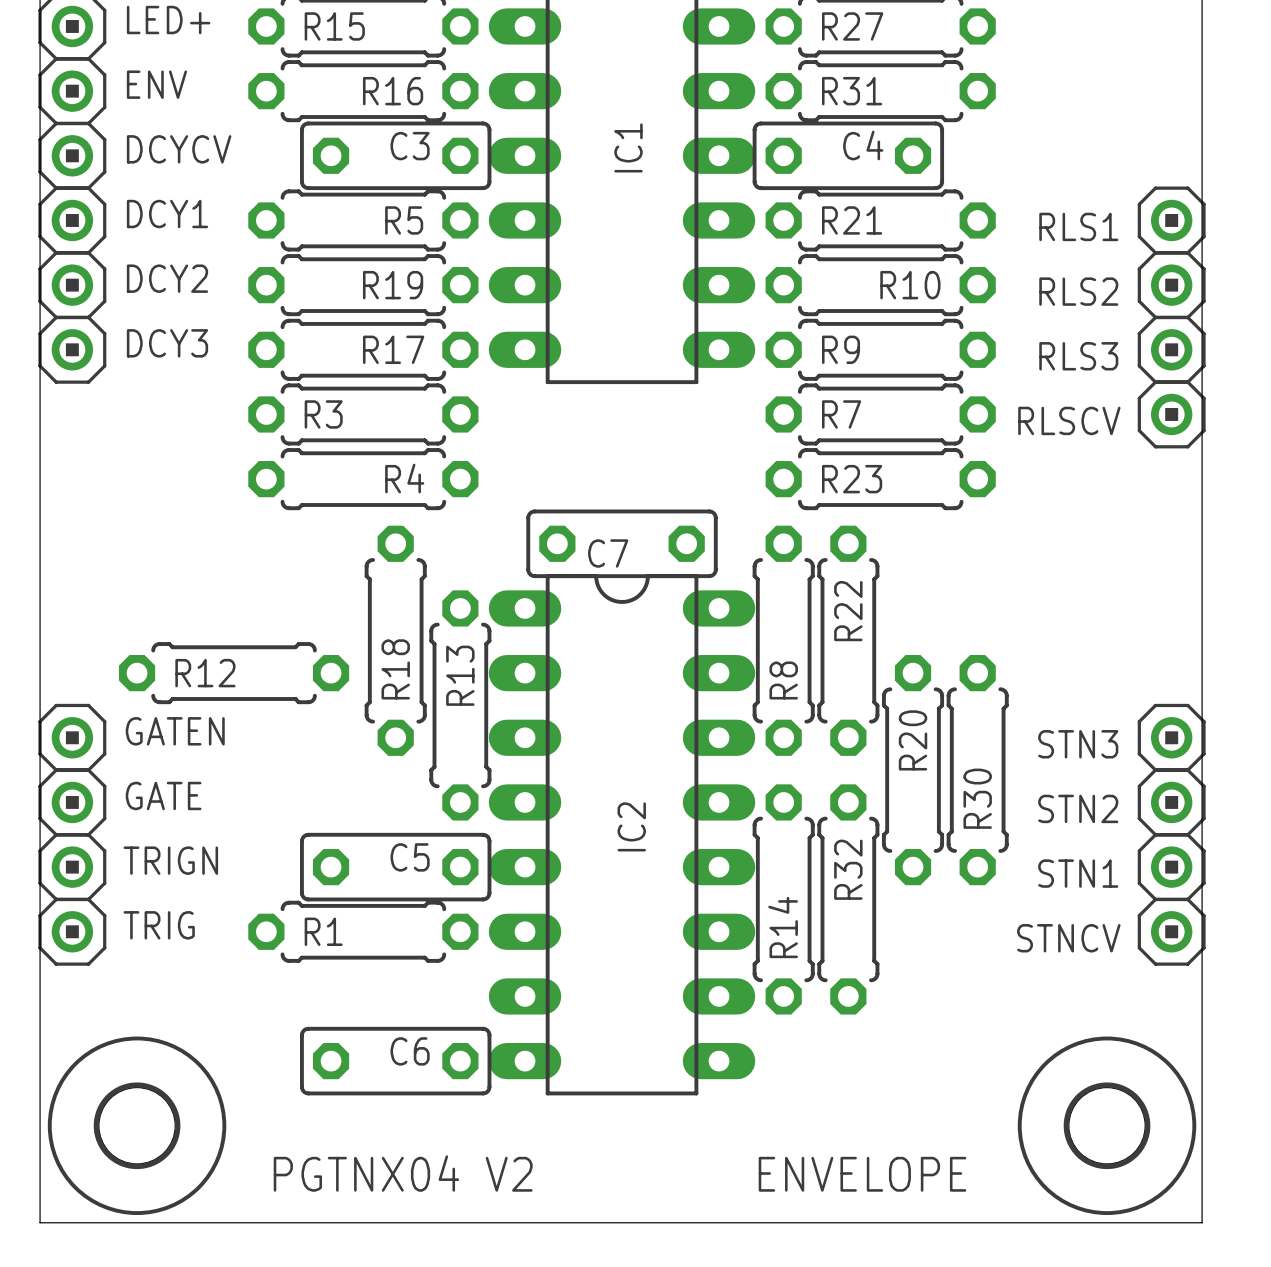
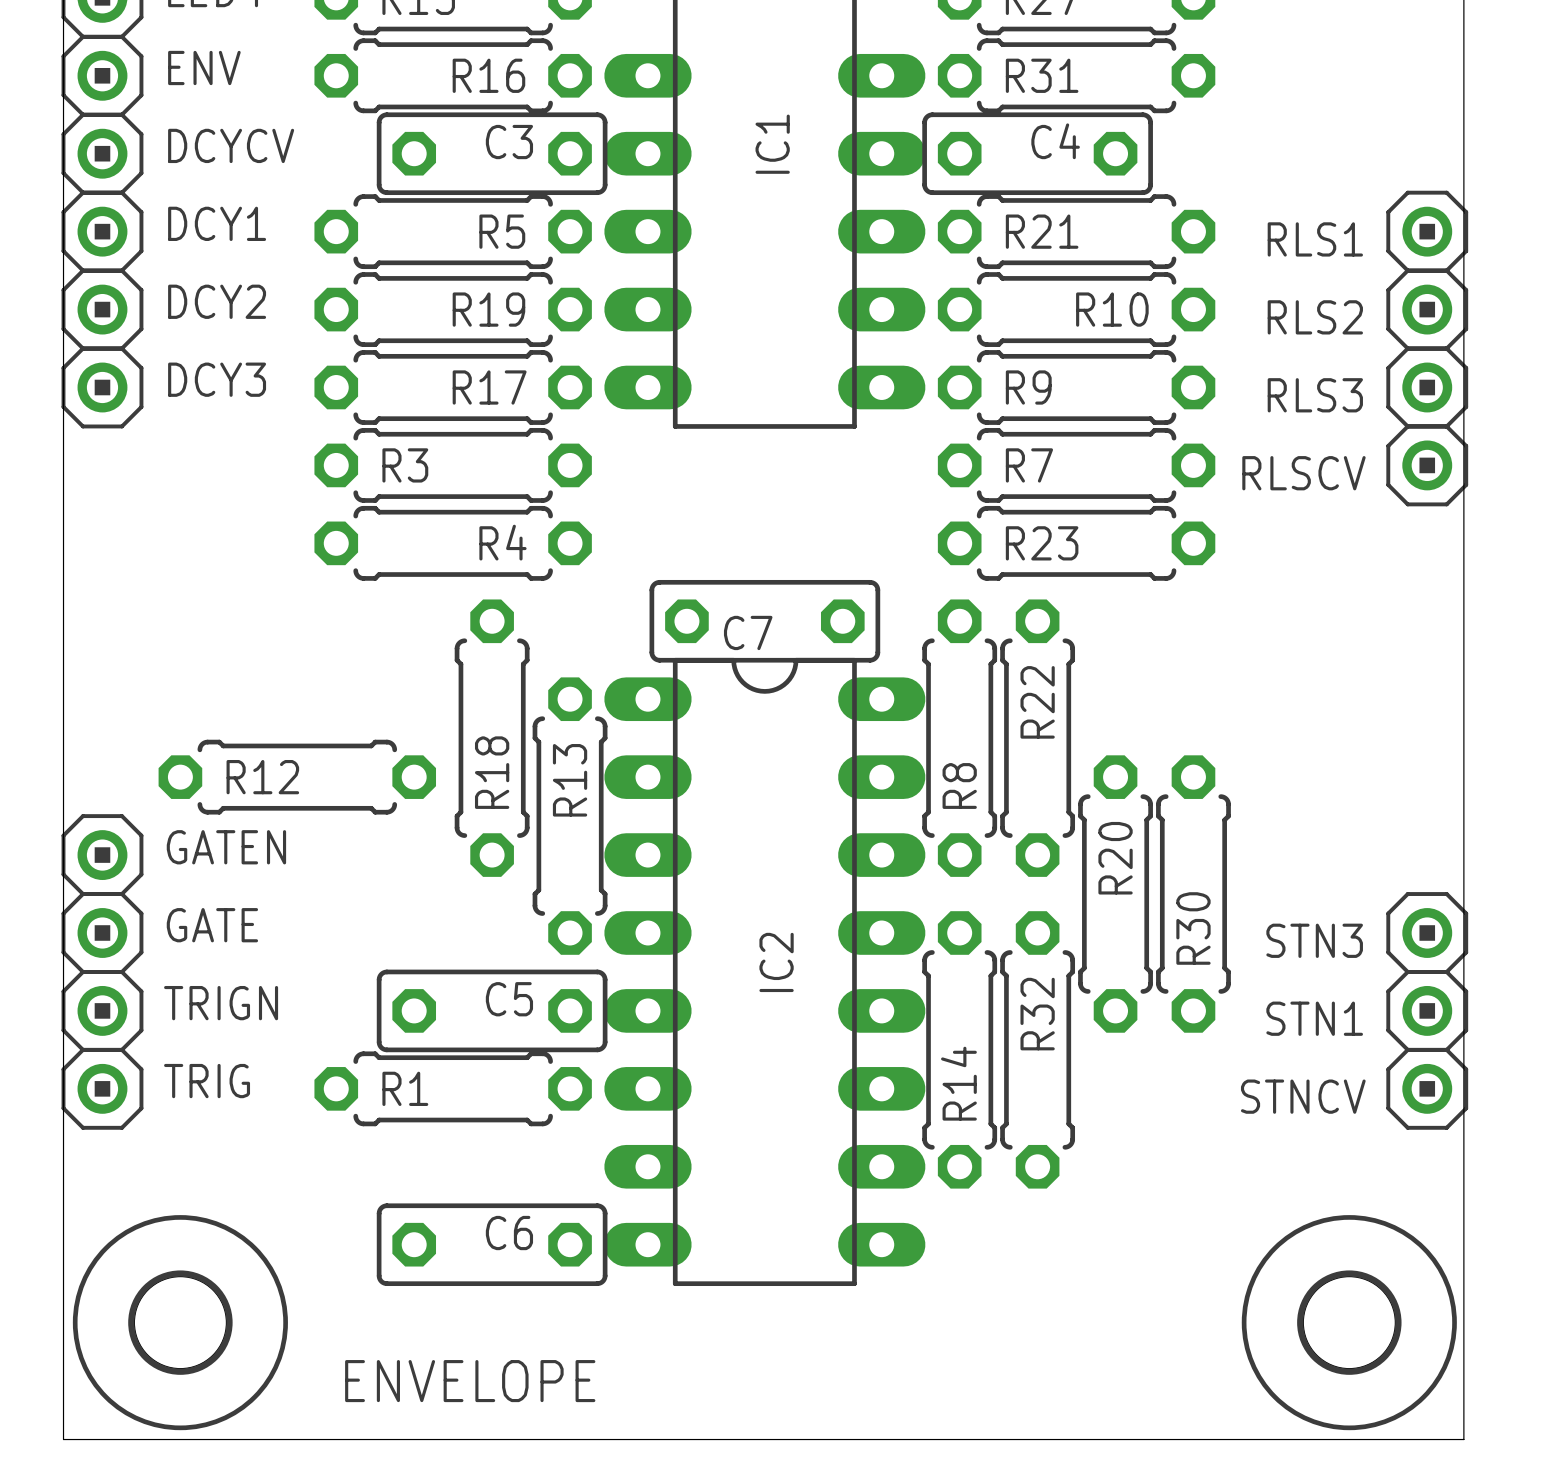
STN3: (1171, 737) -> none
STN2 name: STN2 (1078, 808) -> STN3 (1314, 940)
text: PGTNX04 V2 (403, 1173) -> ENVELOPE (470, 1381)
text: ENVELOPE (862, 1174) -> none

